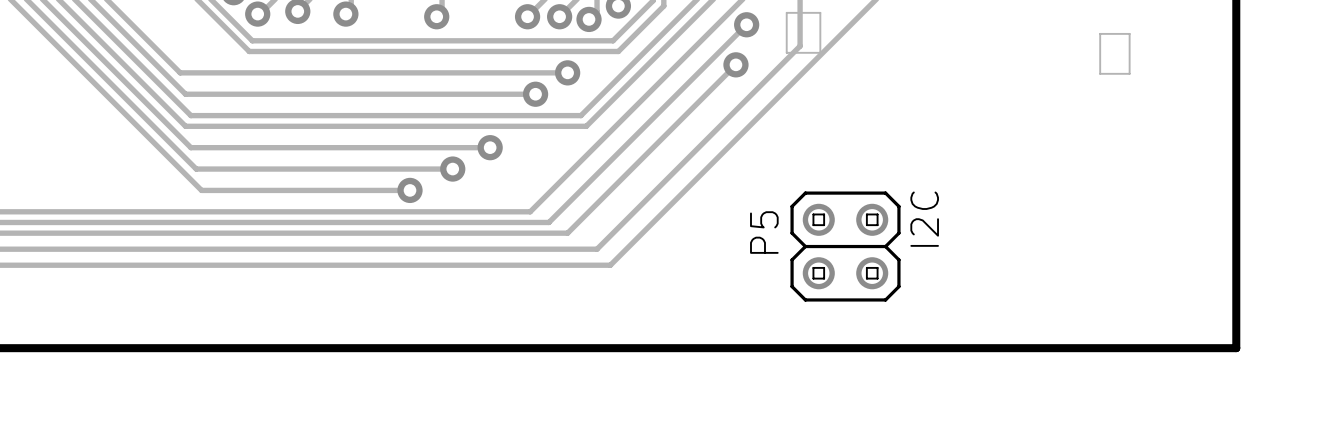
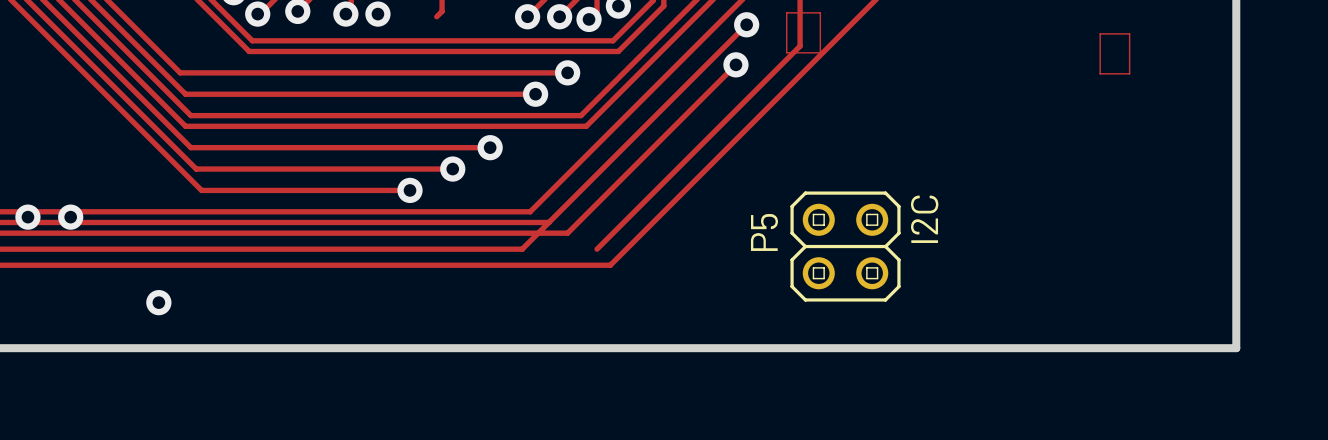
via: none -> (377, 14)
via: (436, 16) -> none
via: none -> (27, 217)
via: none -> (70, 217)
track: (522, 249) (597, 249) -> (522, 249) (548, 222)
via: none -> (158, 302)

